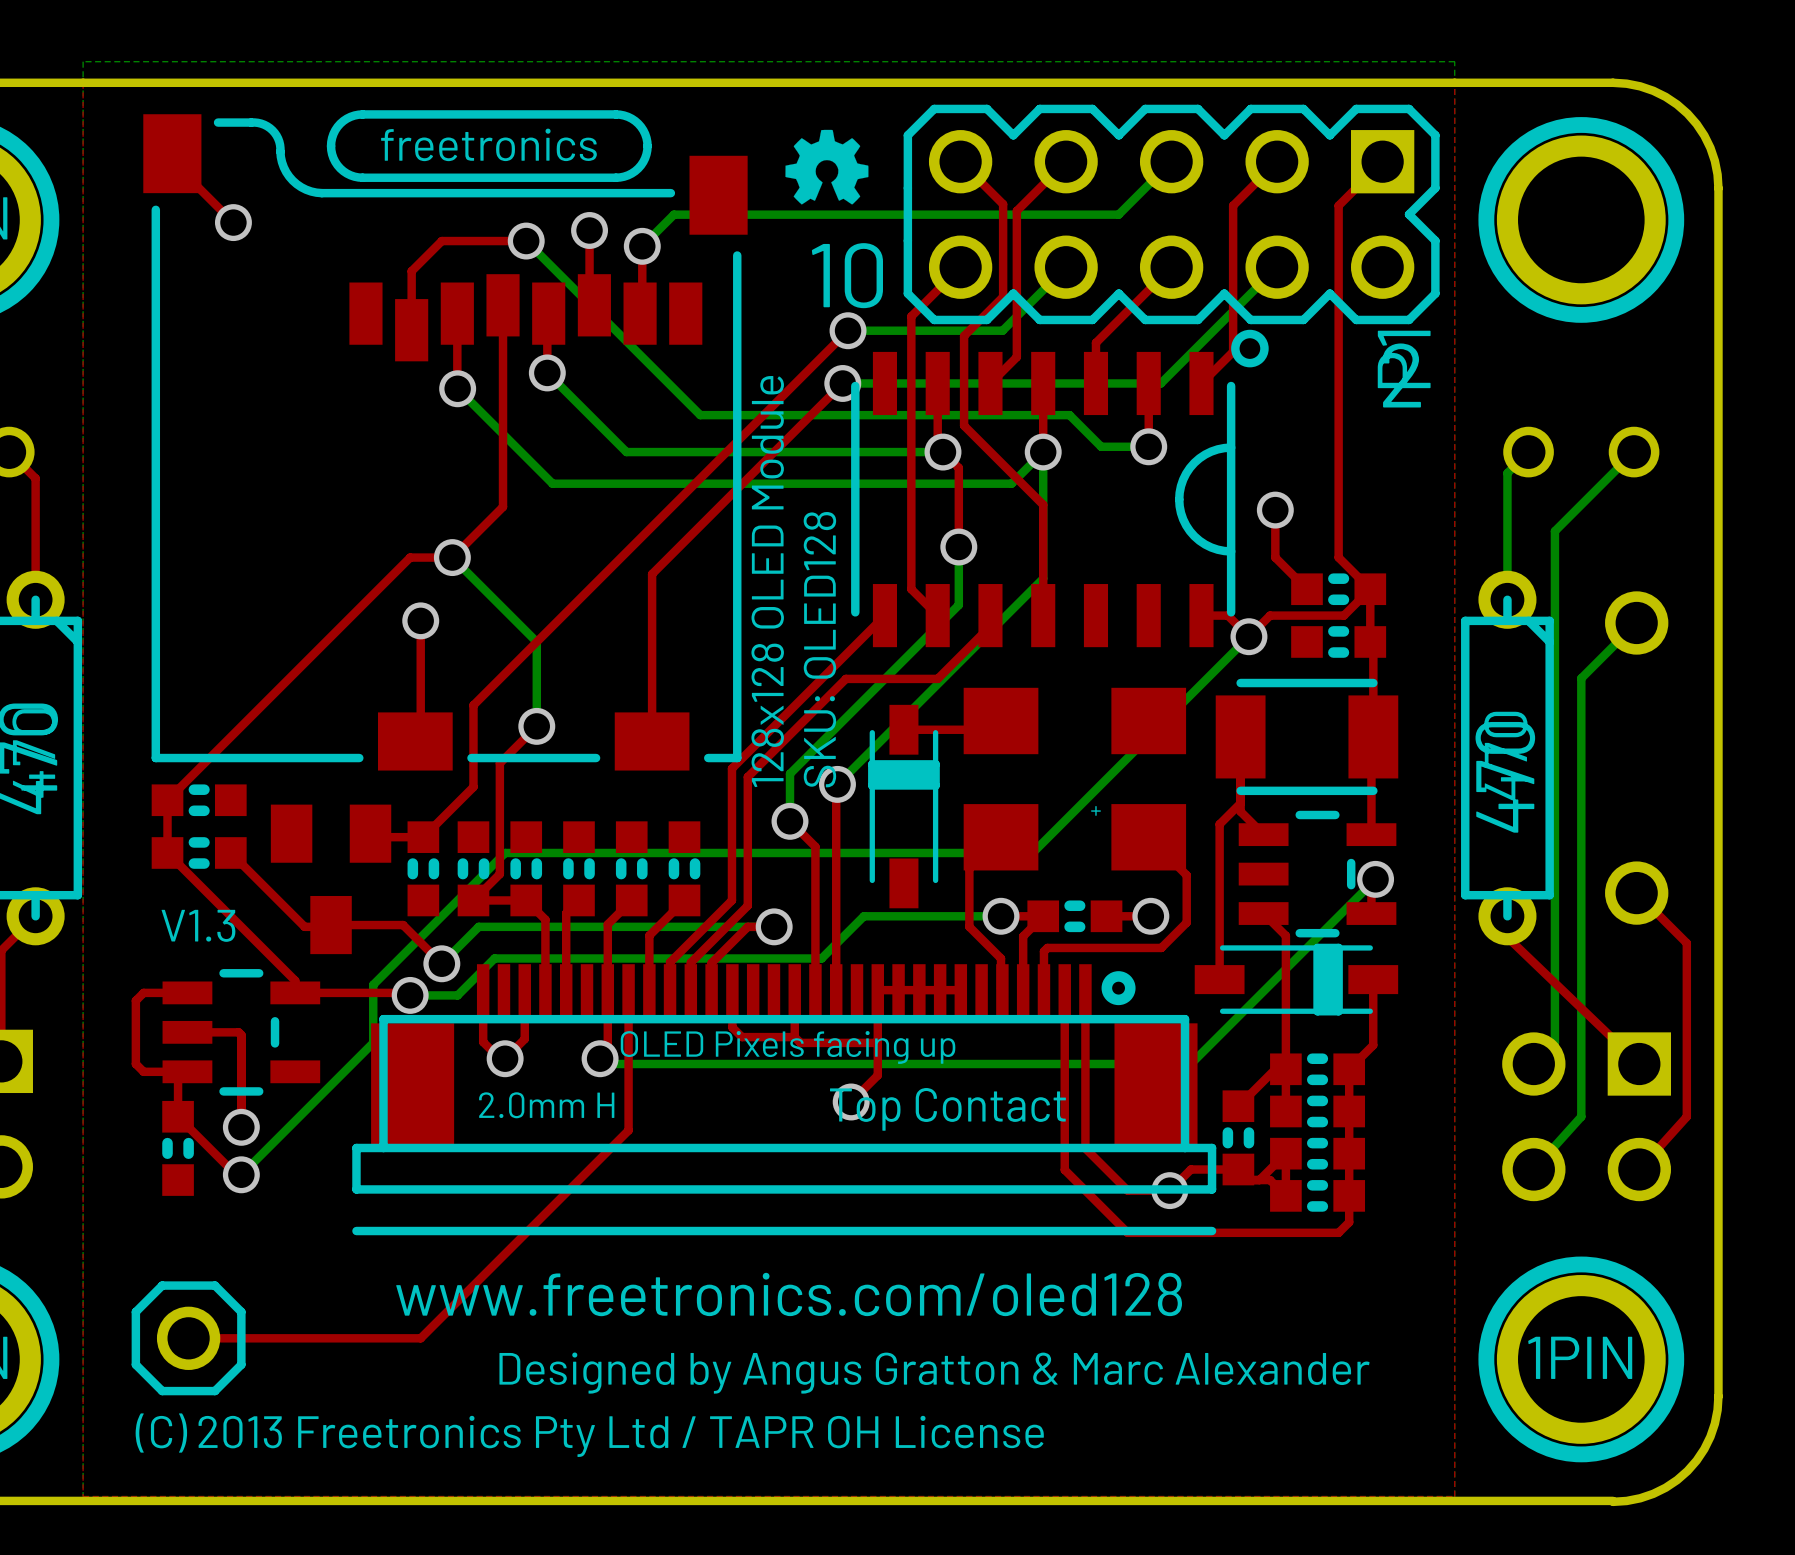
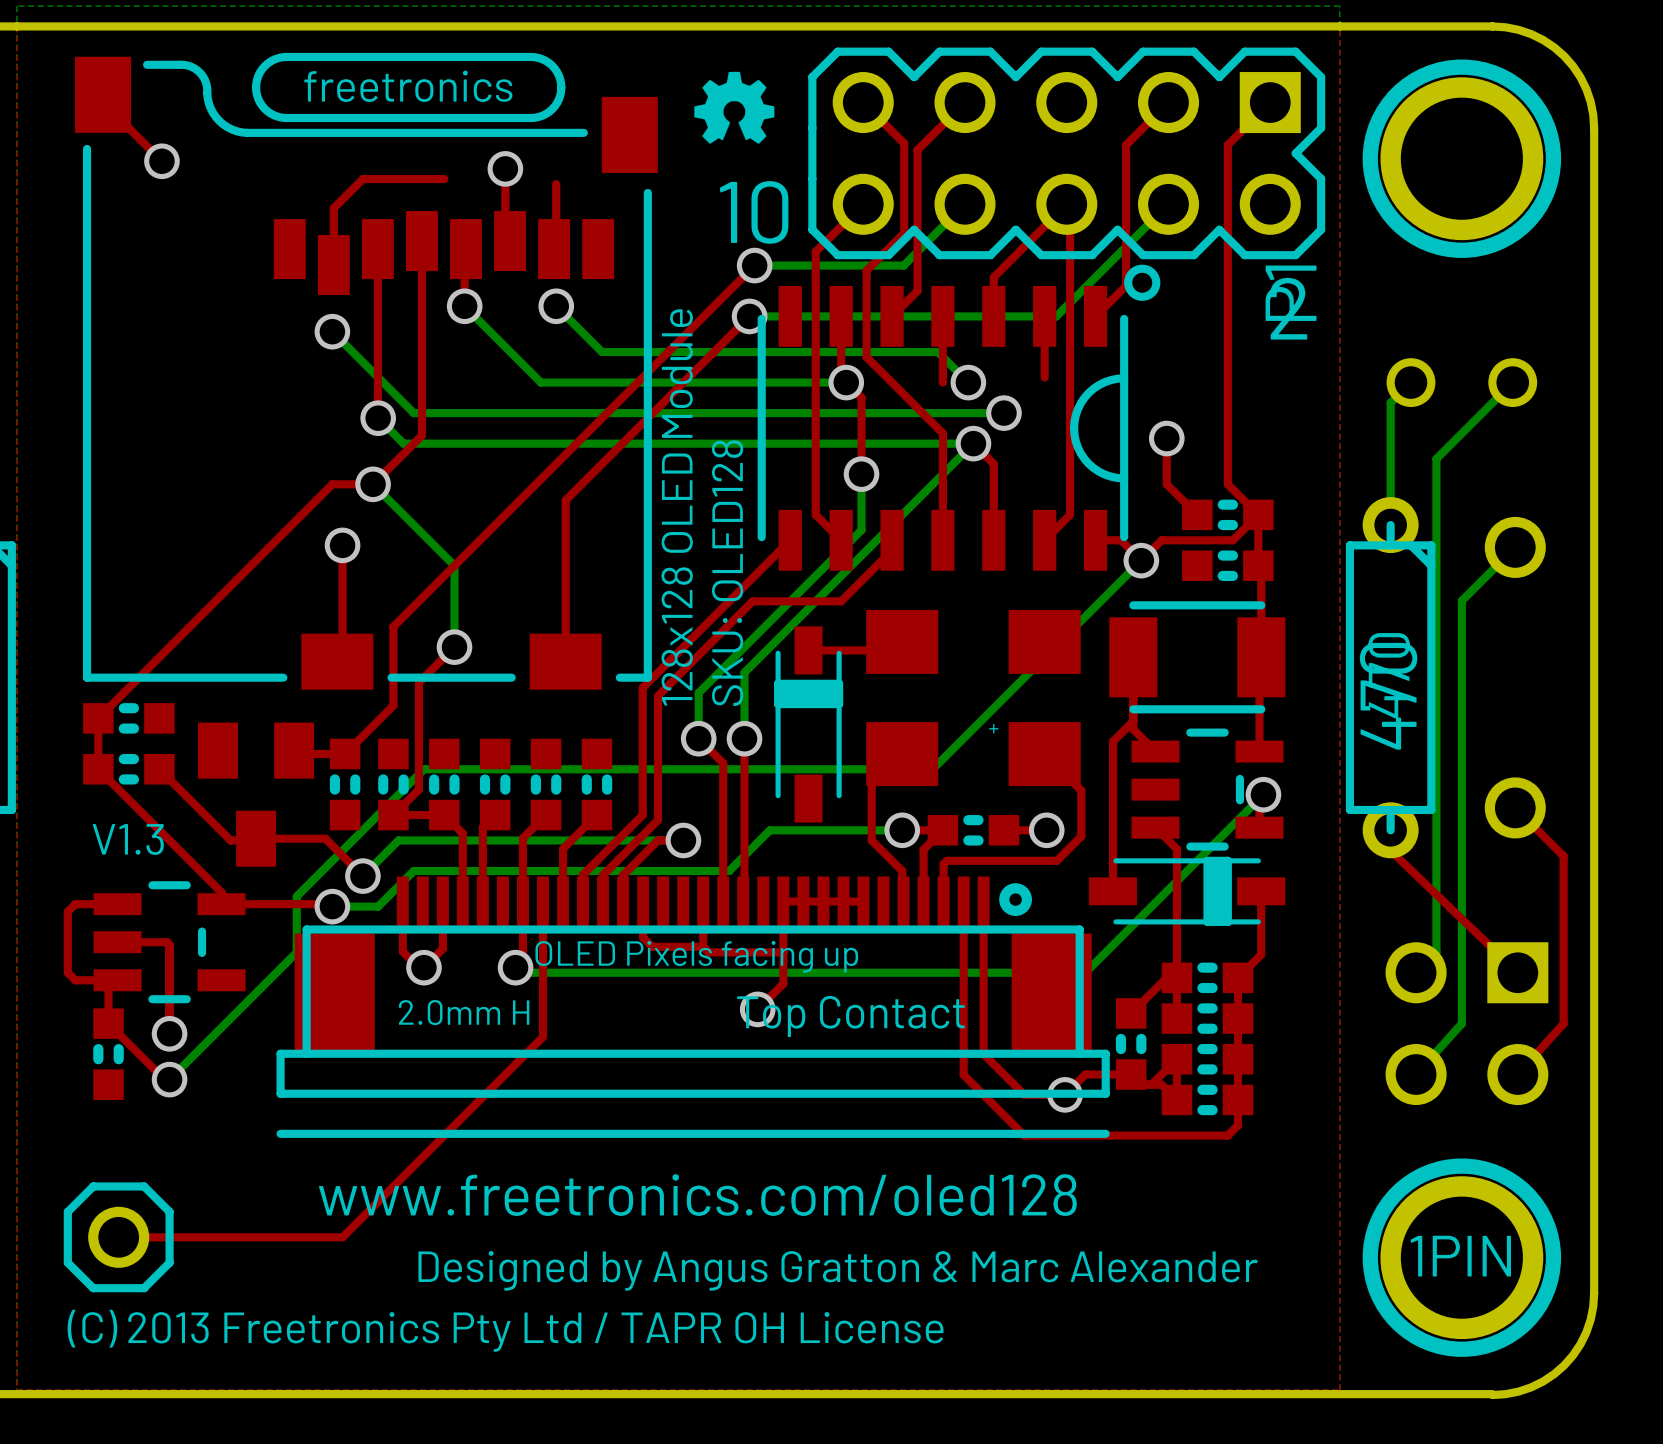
bottom track: (1171, 161) (1118, 214) (673, 214) (642, 246) -> none
bottom track: (526, 241) (700, 415) (1069, 415) (1101, 446) (1148, 446) -> none
via: (526, 241) -> none
via: (642, 246) -> none
top track: none -> (1066, 204) (1070, 207) (1070, 514) (1044, 540)
bottom track: none -> (556, 306) (602, 352) (937, 352) (968, 382)
via: none -> (556, 306)
top track: none -> (377, 321) (377, 417)
bottom track: (457, 388) (552, 483) -> (332, 331) (413, 413) (469, 413)
via position: (457, 388) -> (332, 331)
via: (1148, 446) -> none
via position: (1043, 452) -> (968, 382)
bottom track: (1011, 483) (1043, 452) (1043, 578) (837, 784) -> (912, 413) (1003, 413)
via: none -> (1003, 413)
bottom track: none -> (378, 418) (403, 443) (973, 443) (744, 672) (744, 738)
via: none -> (378, 418)
top track: none -> (973, 443) (993, 463) (993, 540)
via: none -> (973, 443)
top track: (837, 784) (836, 990) -> (744, 738) (743, 901)
via position: (837, 784) -> (744, 738)

